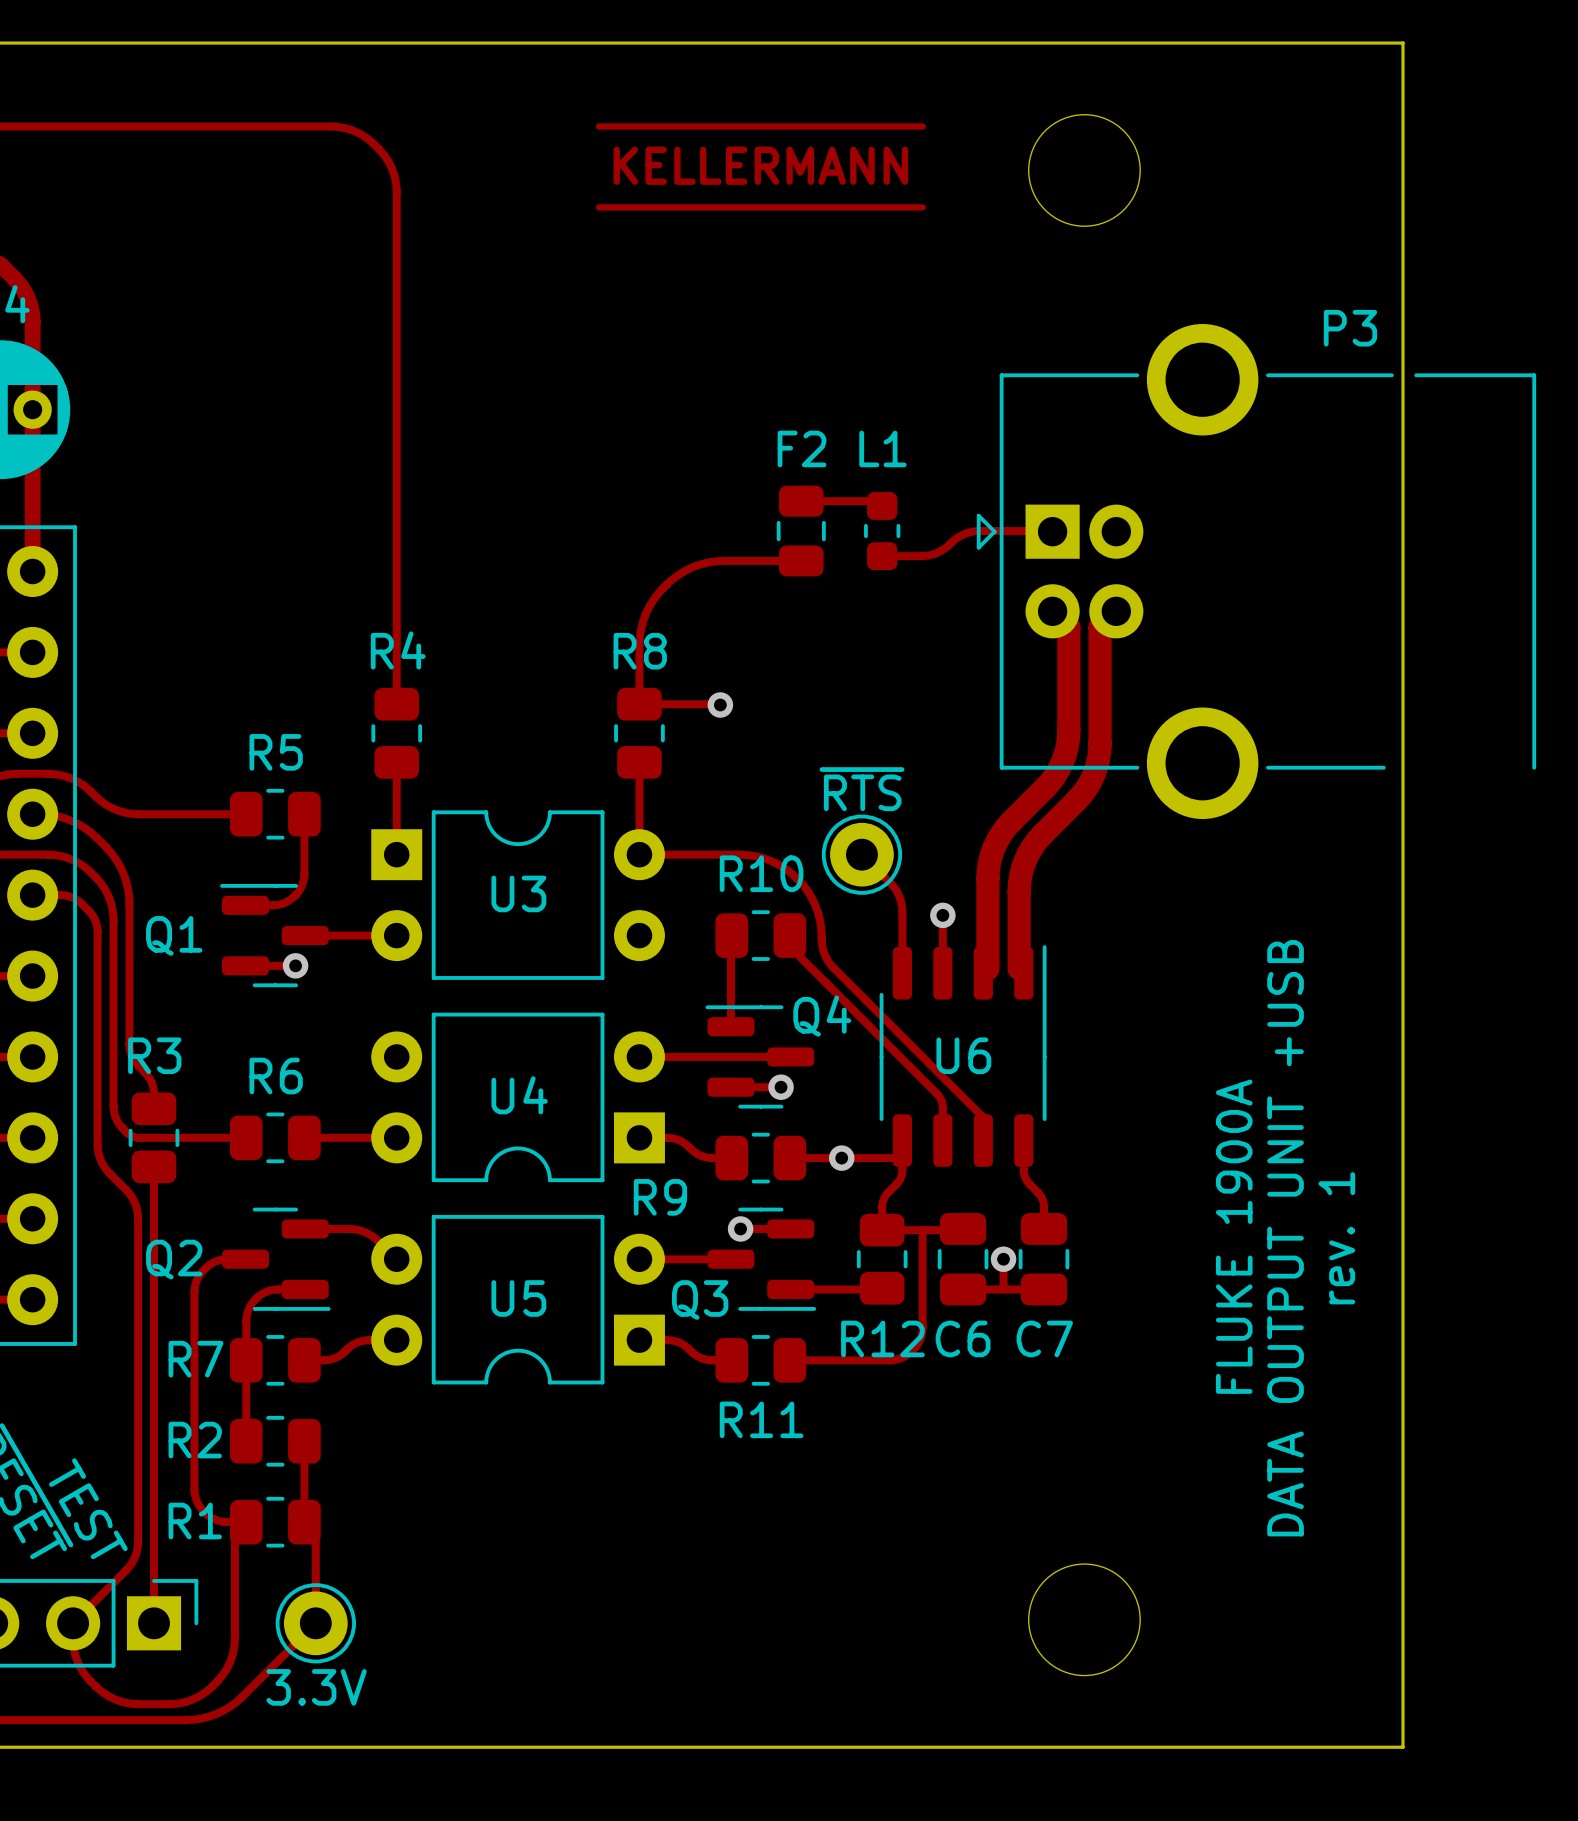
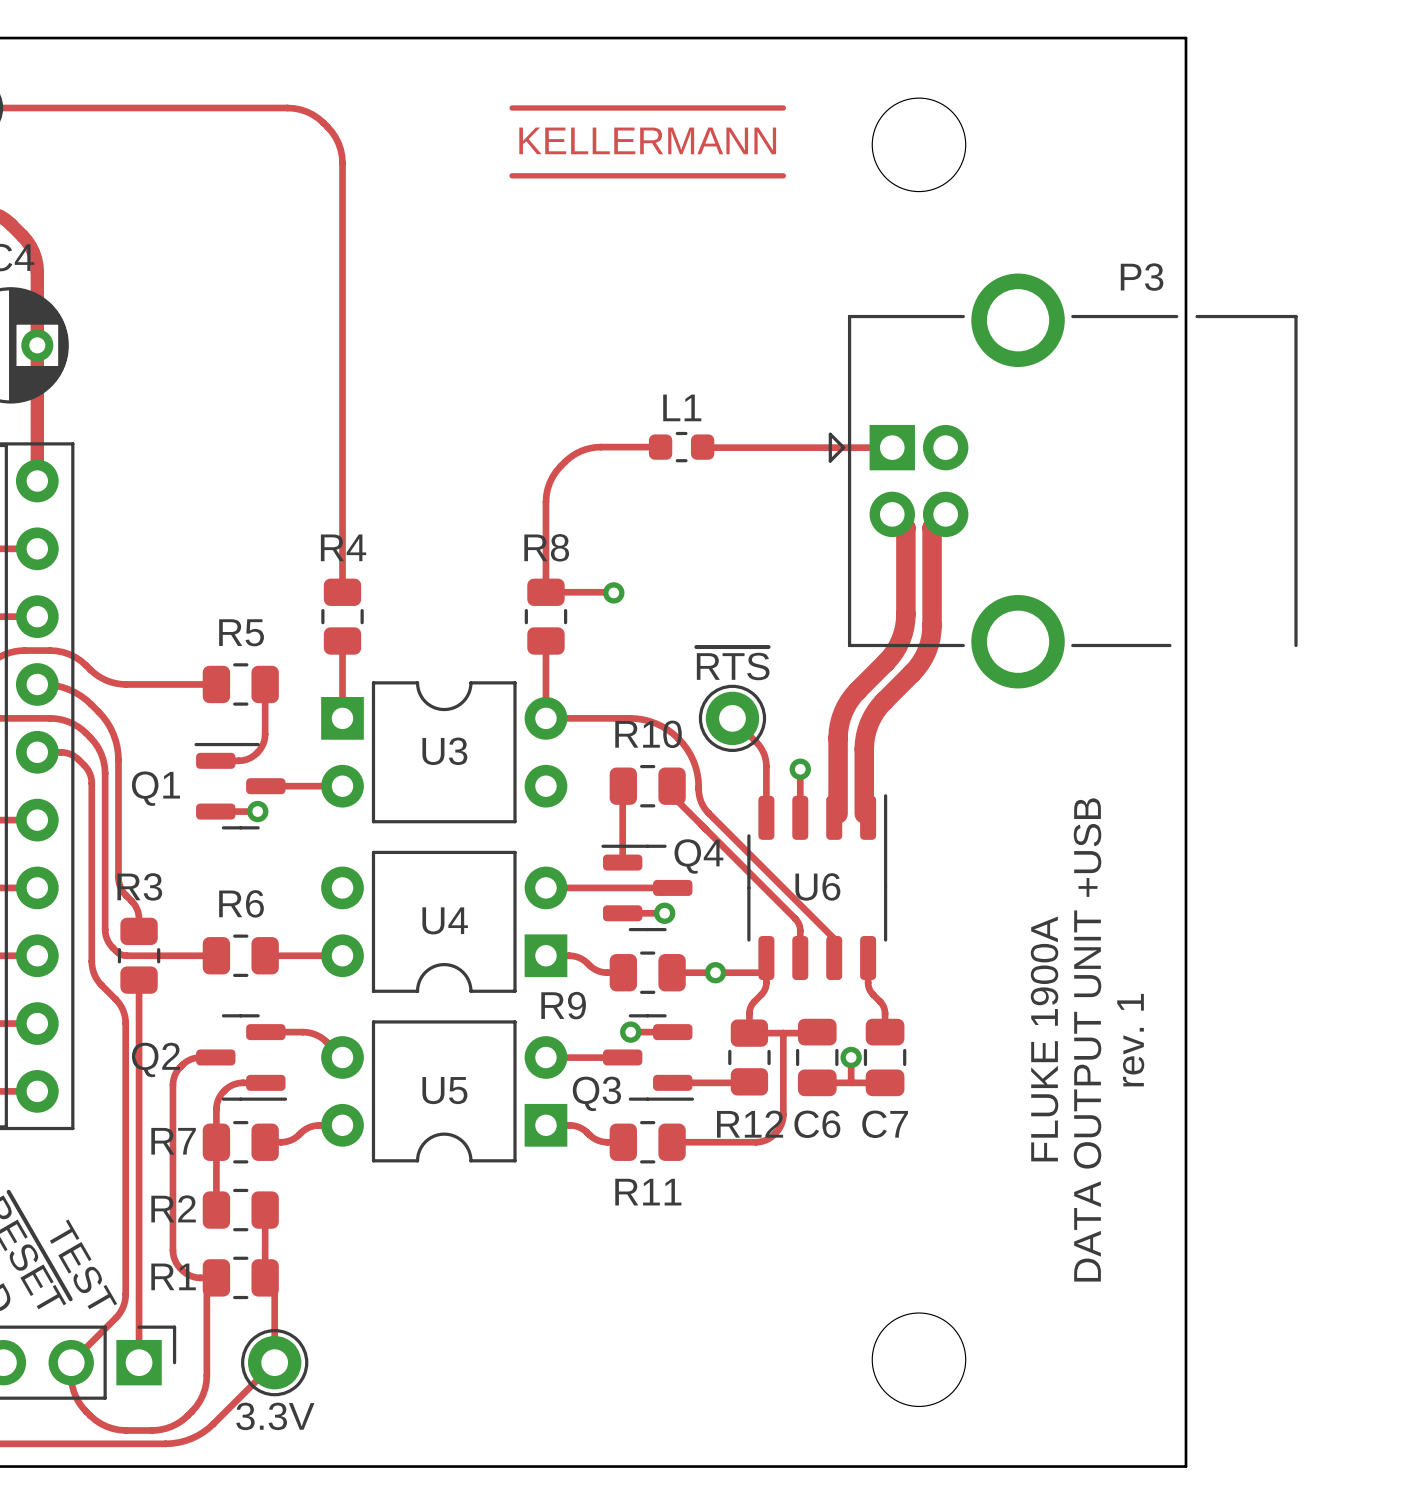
track: (801, 501) (877, 501) (882, 505) -> none
F2: (801, 531) -> none
L1 rotation: 0° (882, 531) -> 90° clockwise (681, 447)
L1 position: (882, 531) -> (681, 447)
track: (1044, 531) (971, 531) (960, 535) (943, 549) (932, 554) (882, 556) -> (885, 447) (703, 447)
track: (801, 560) (716, 561) (700, 564) (685, 570) (666, 584) (653, 600) (642, 621) (639, 645) -> (660, 447) (595, 447) (581, 450) (568, 458) (556, 471) (547, 488) (545, 543)

